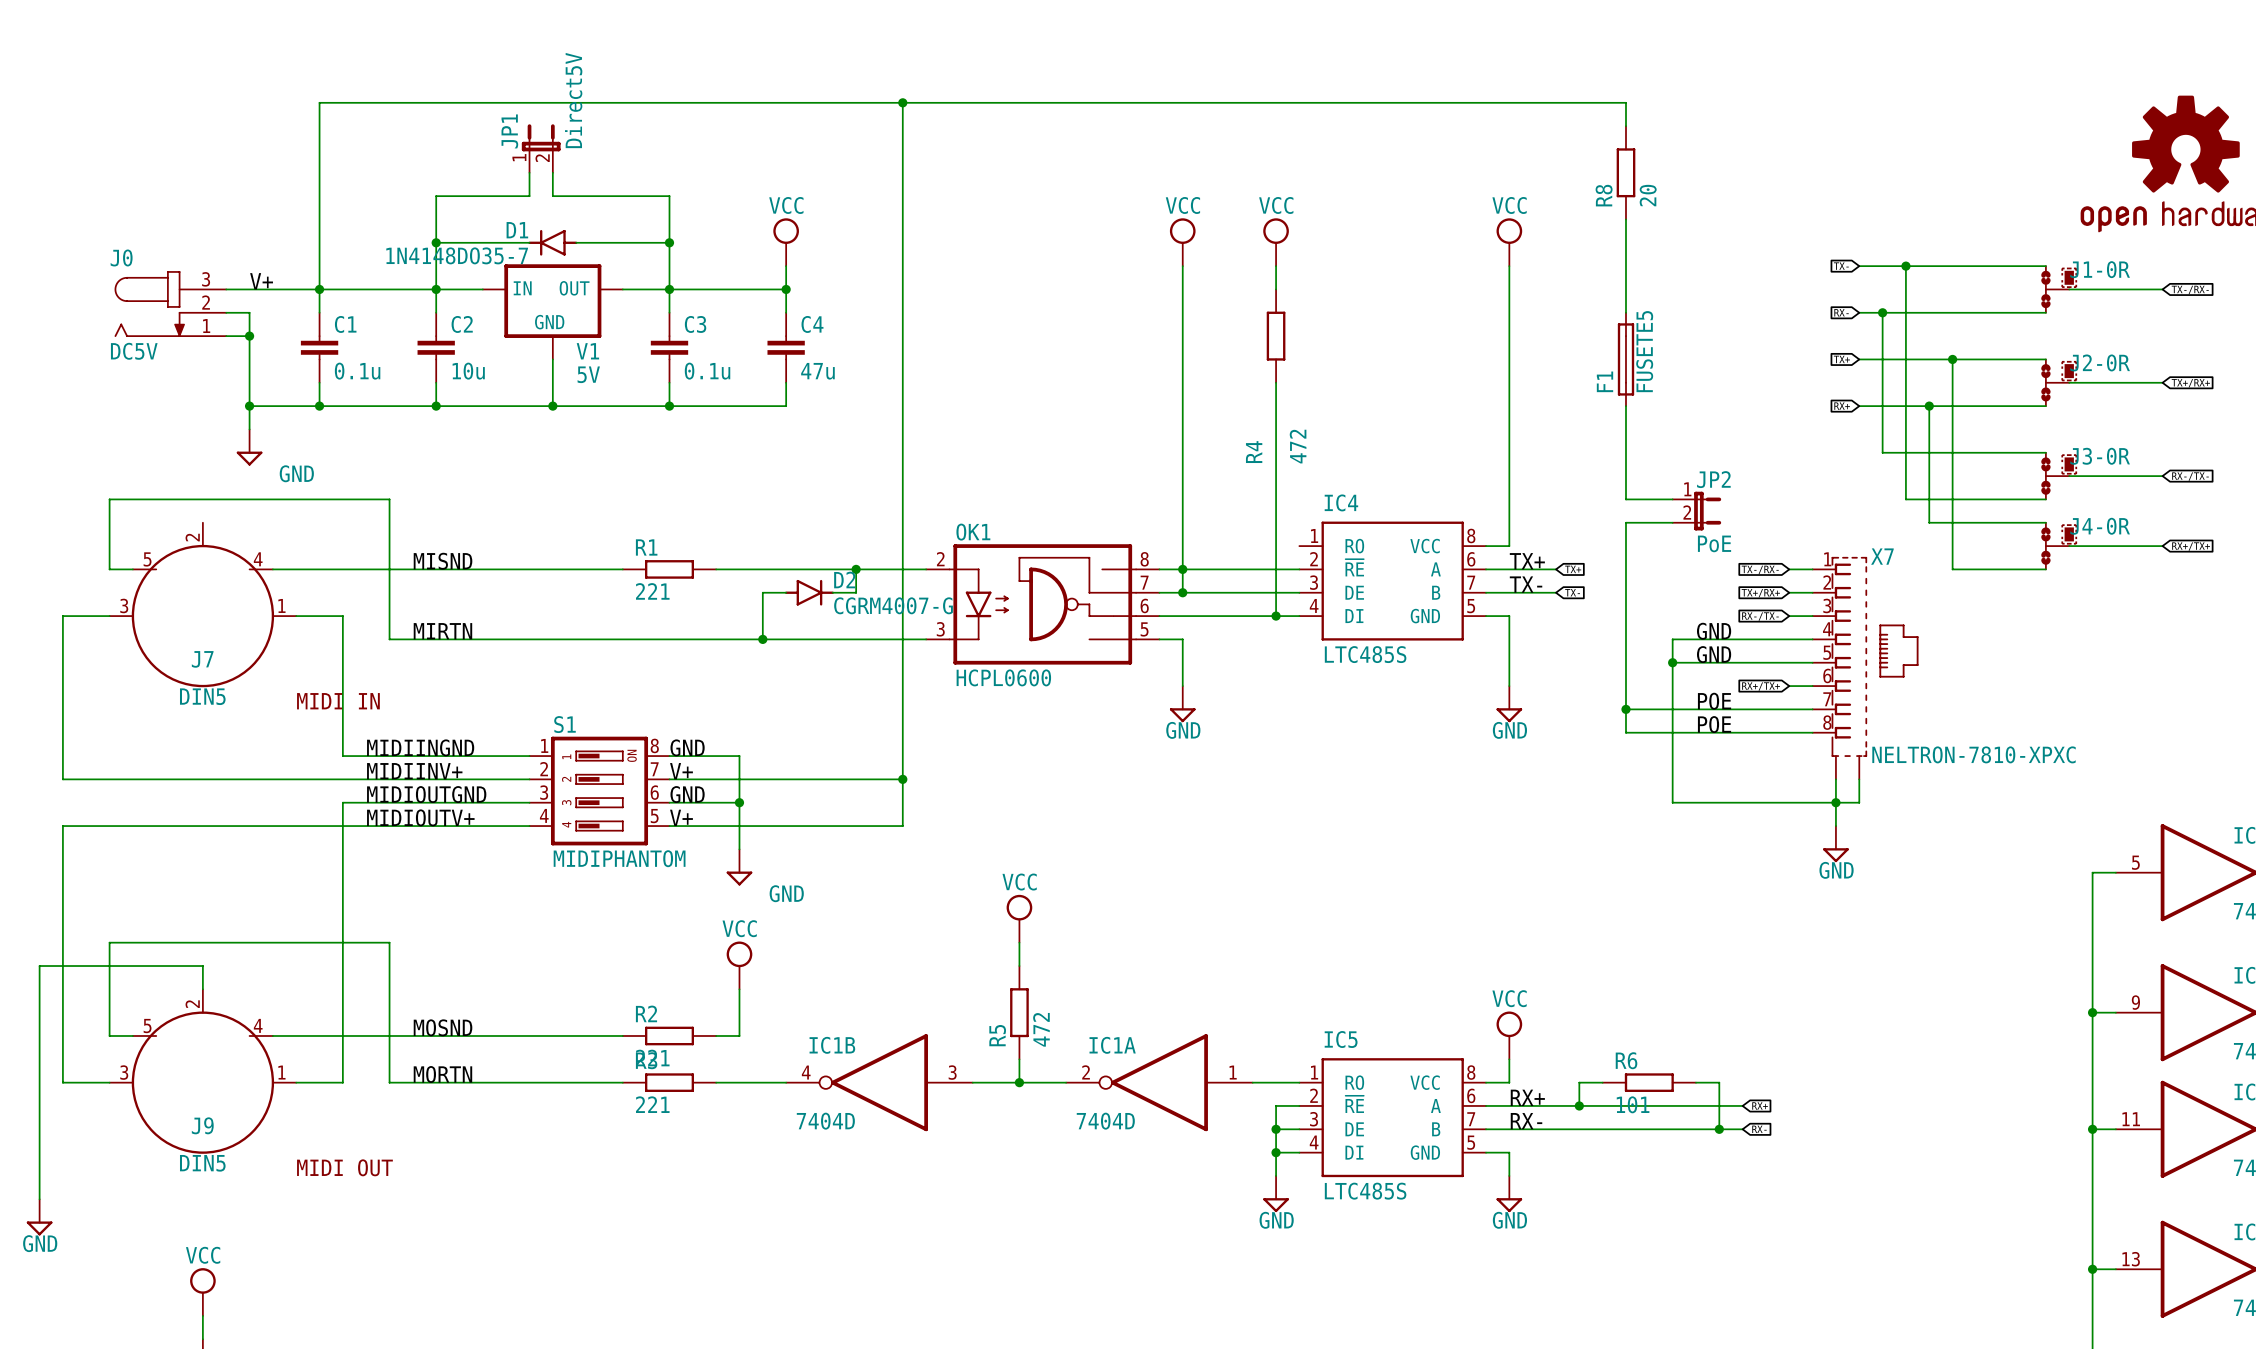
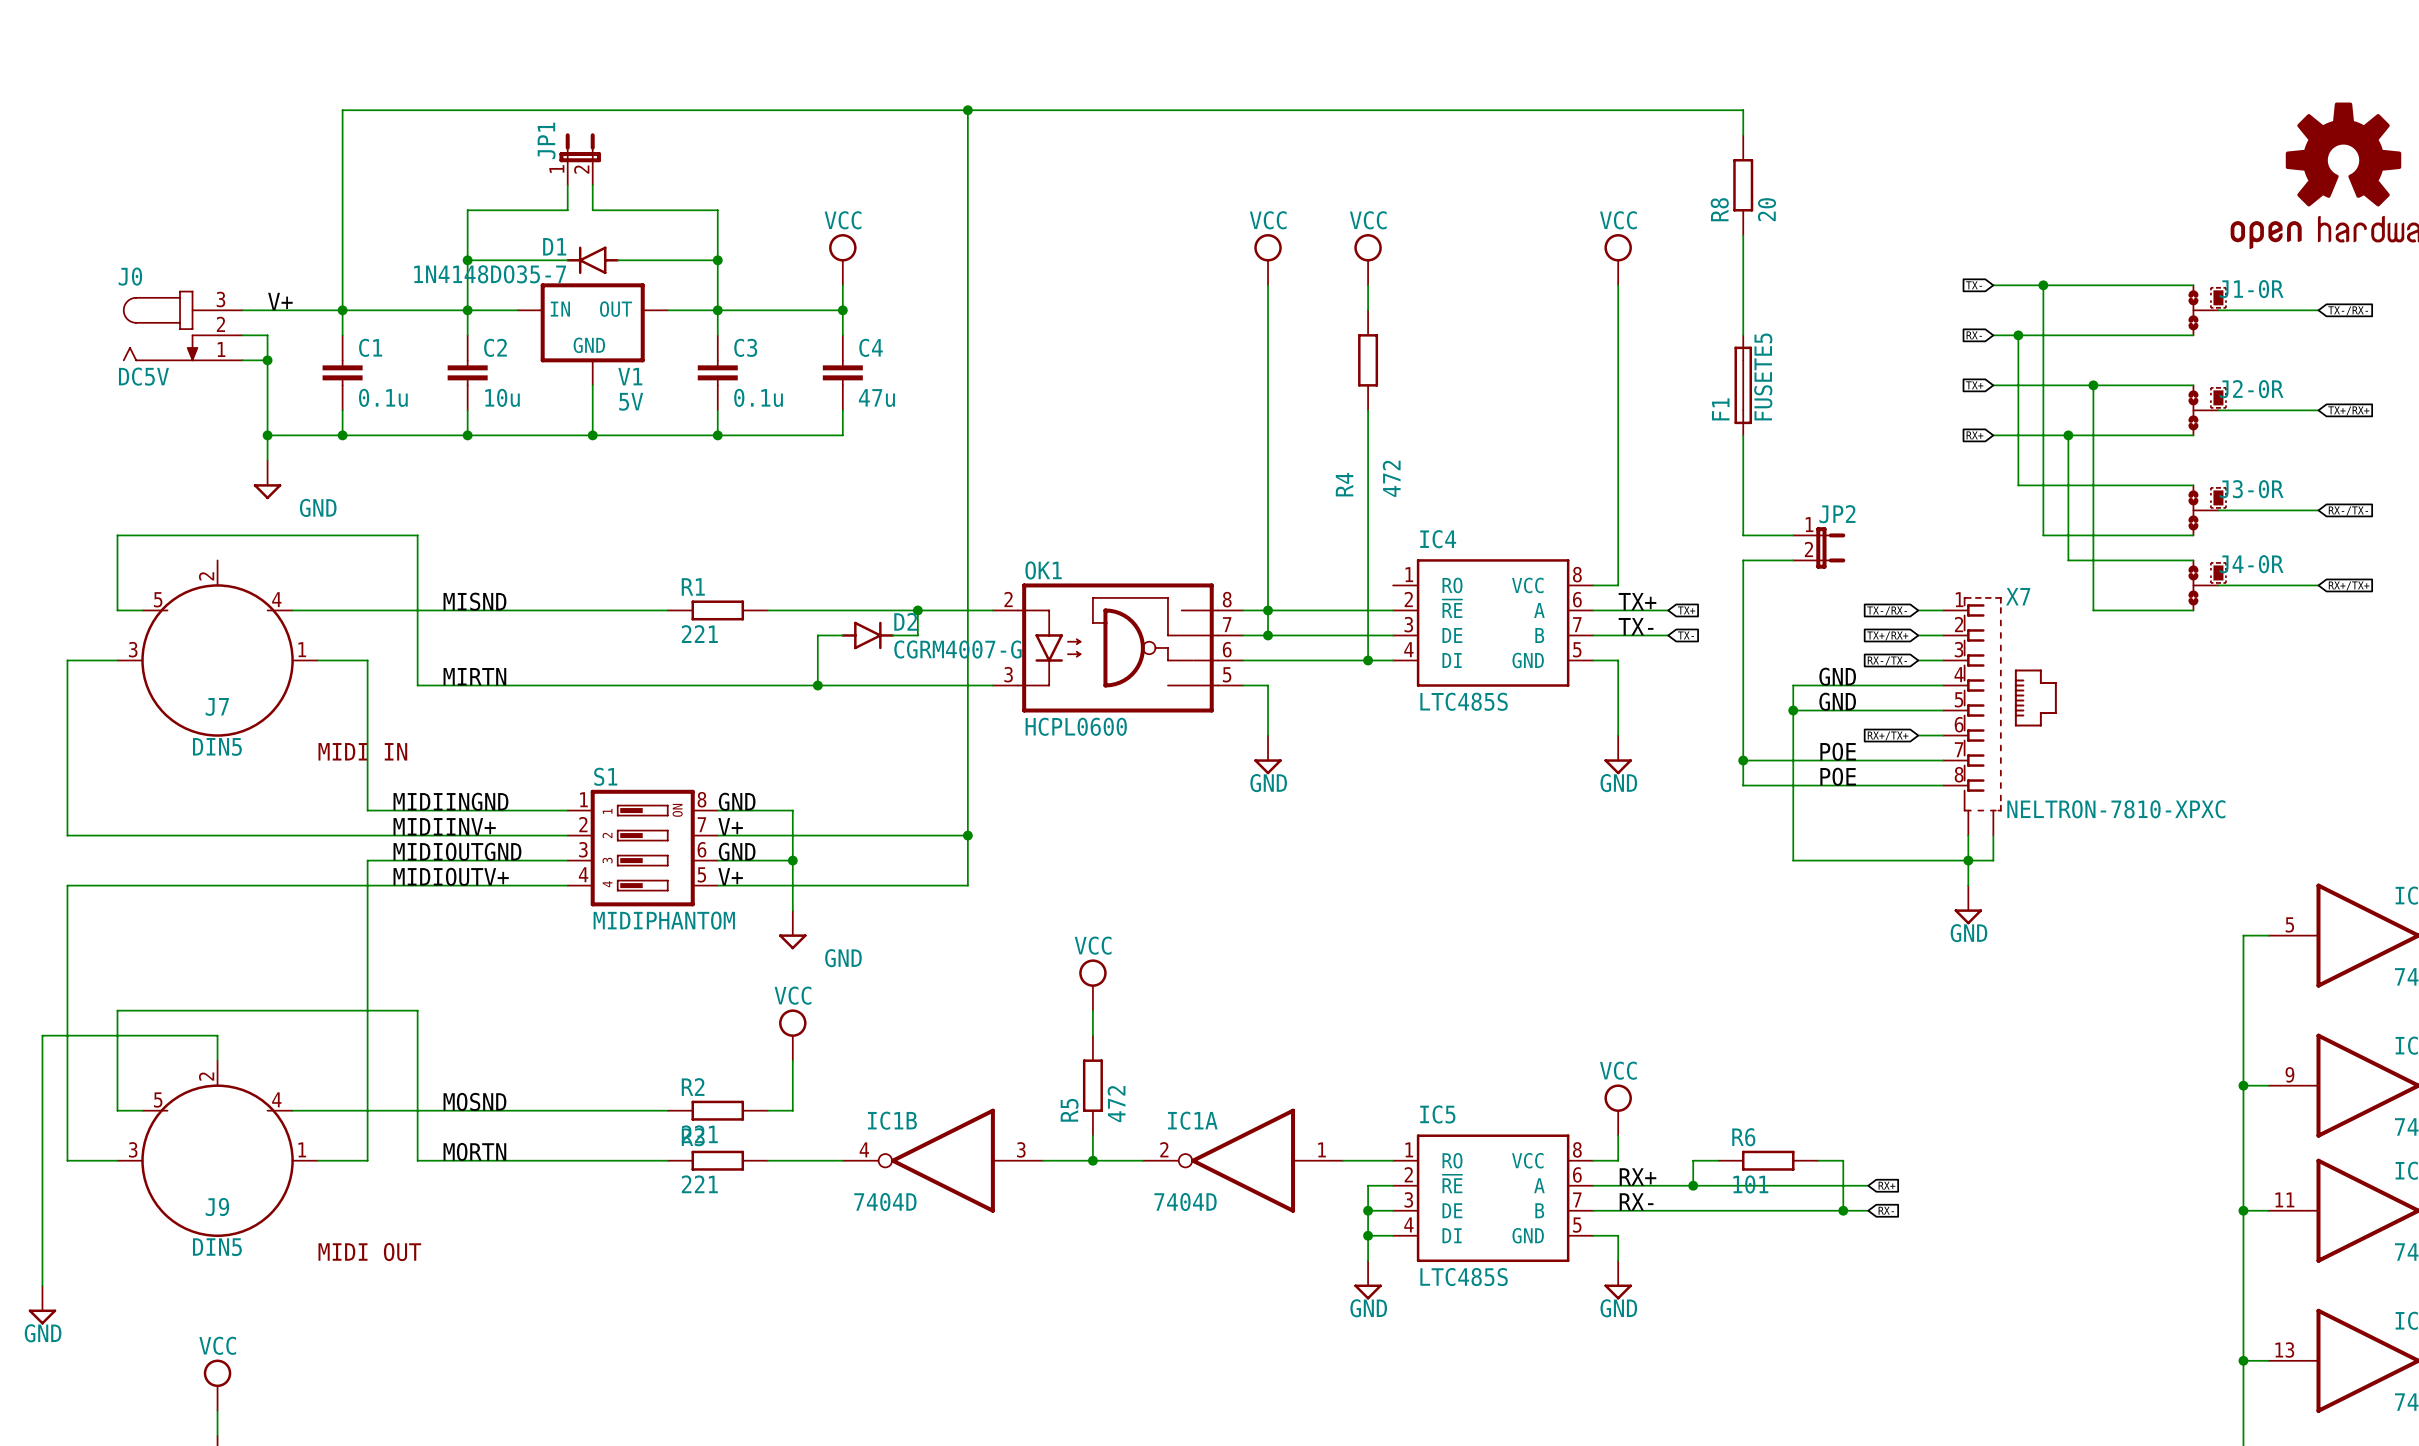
JP1 value: Direct5V (573, 100) -> none
JP2 value: PoE (1714, 543) -> none

